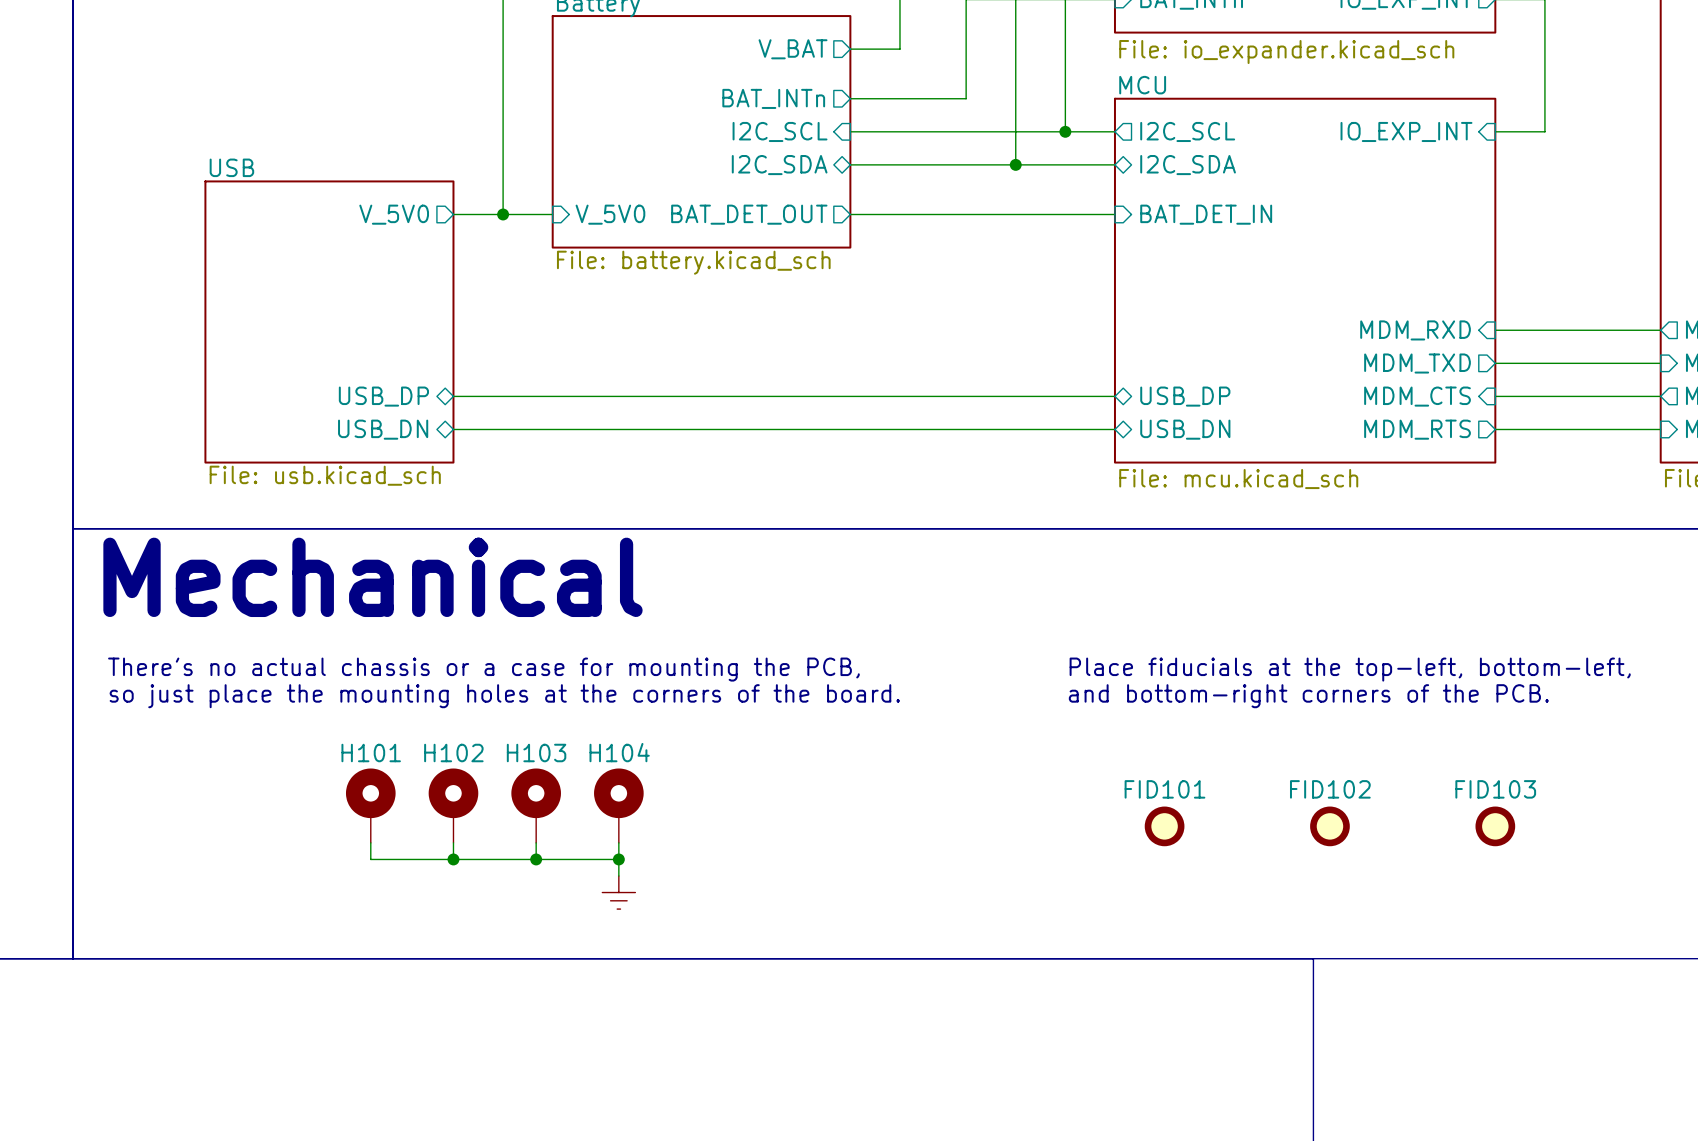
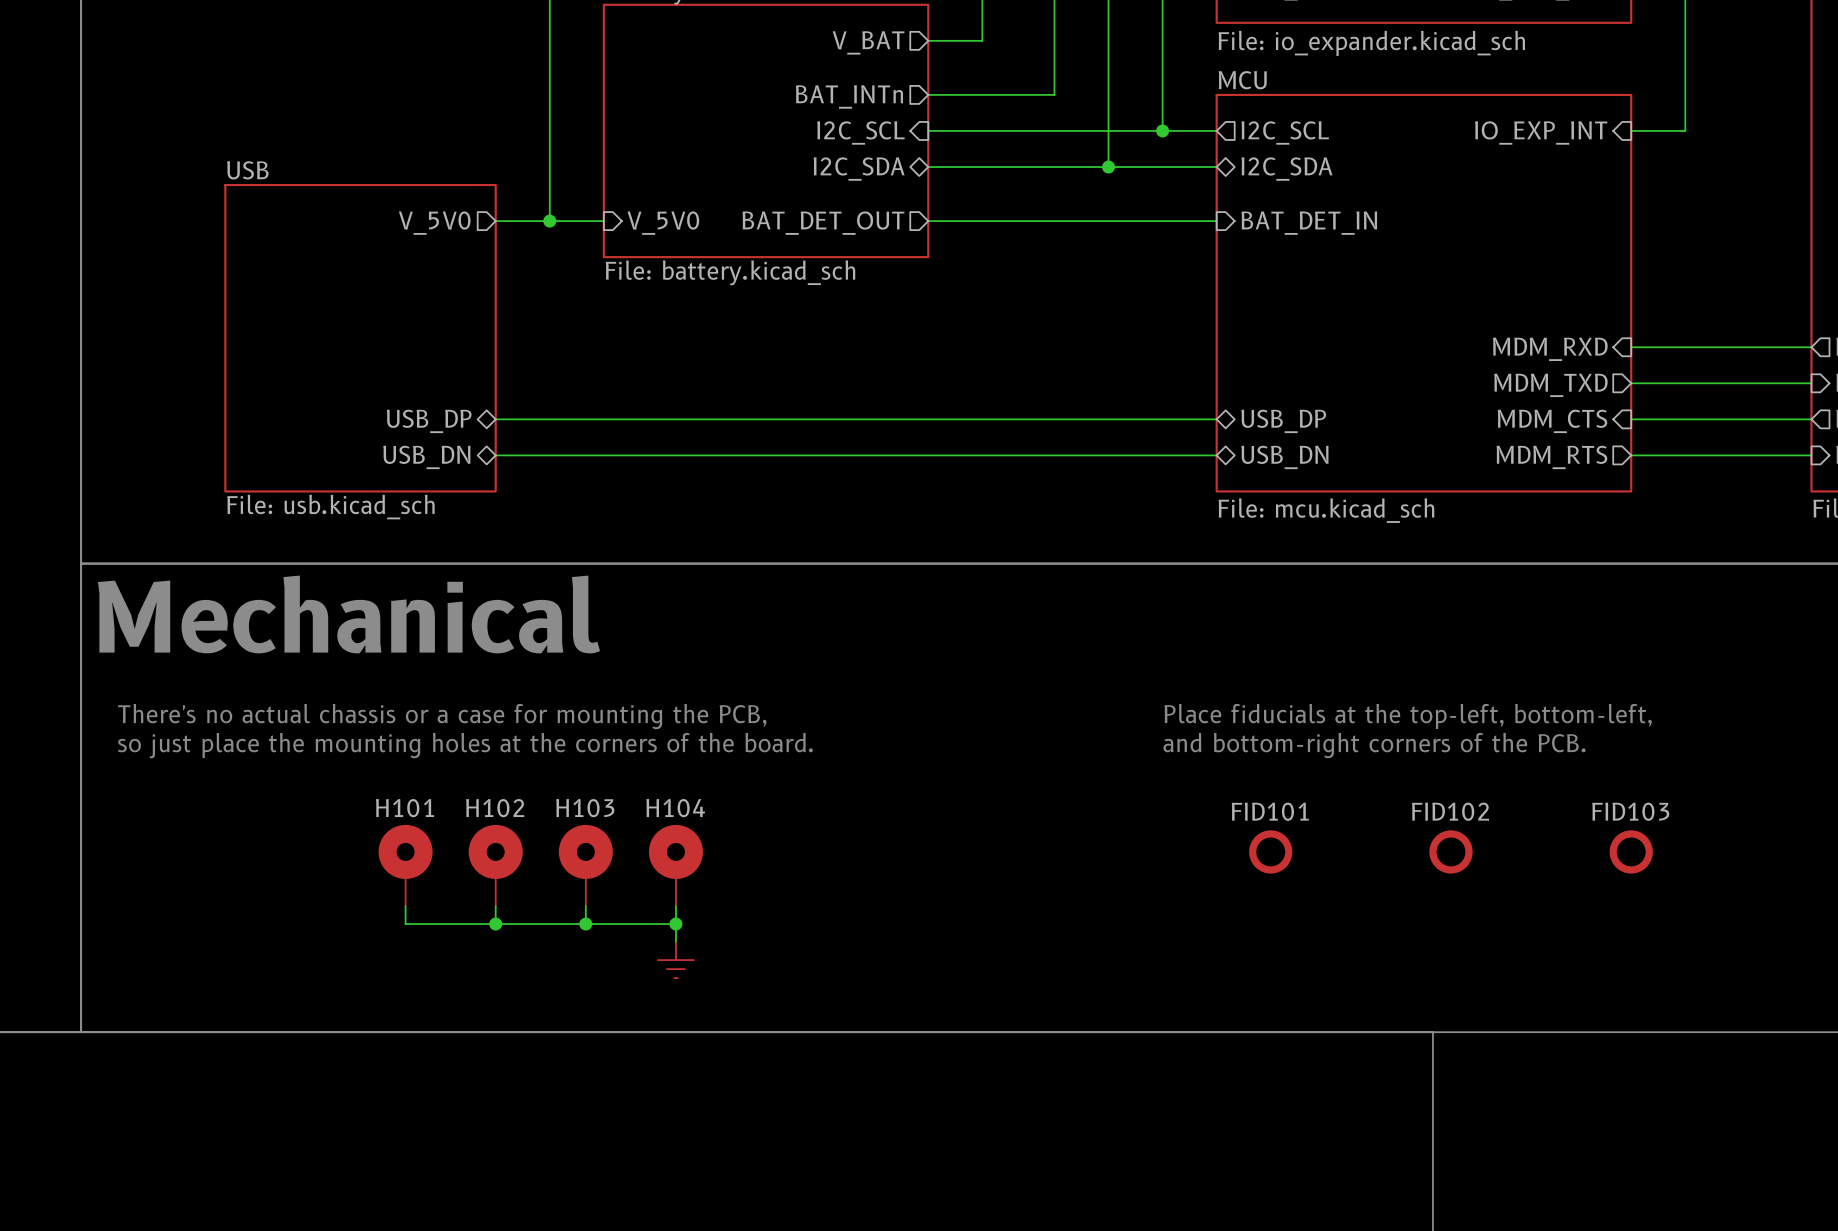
FID101 position: (1164, 826) -> (1270, 851)
FID102 position: (1329, 826) -> (1450, 851)
FID103 position: (1495, 826) -> (1631, 851)

